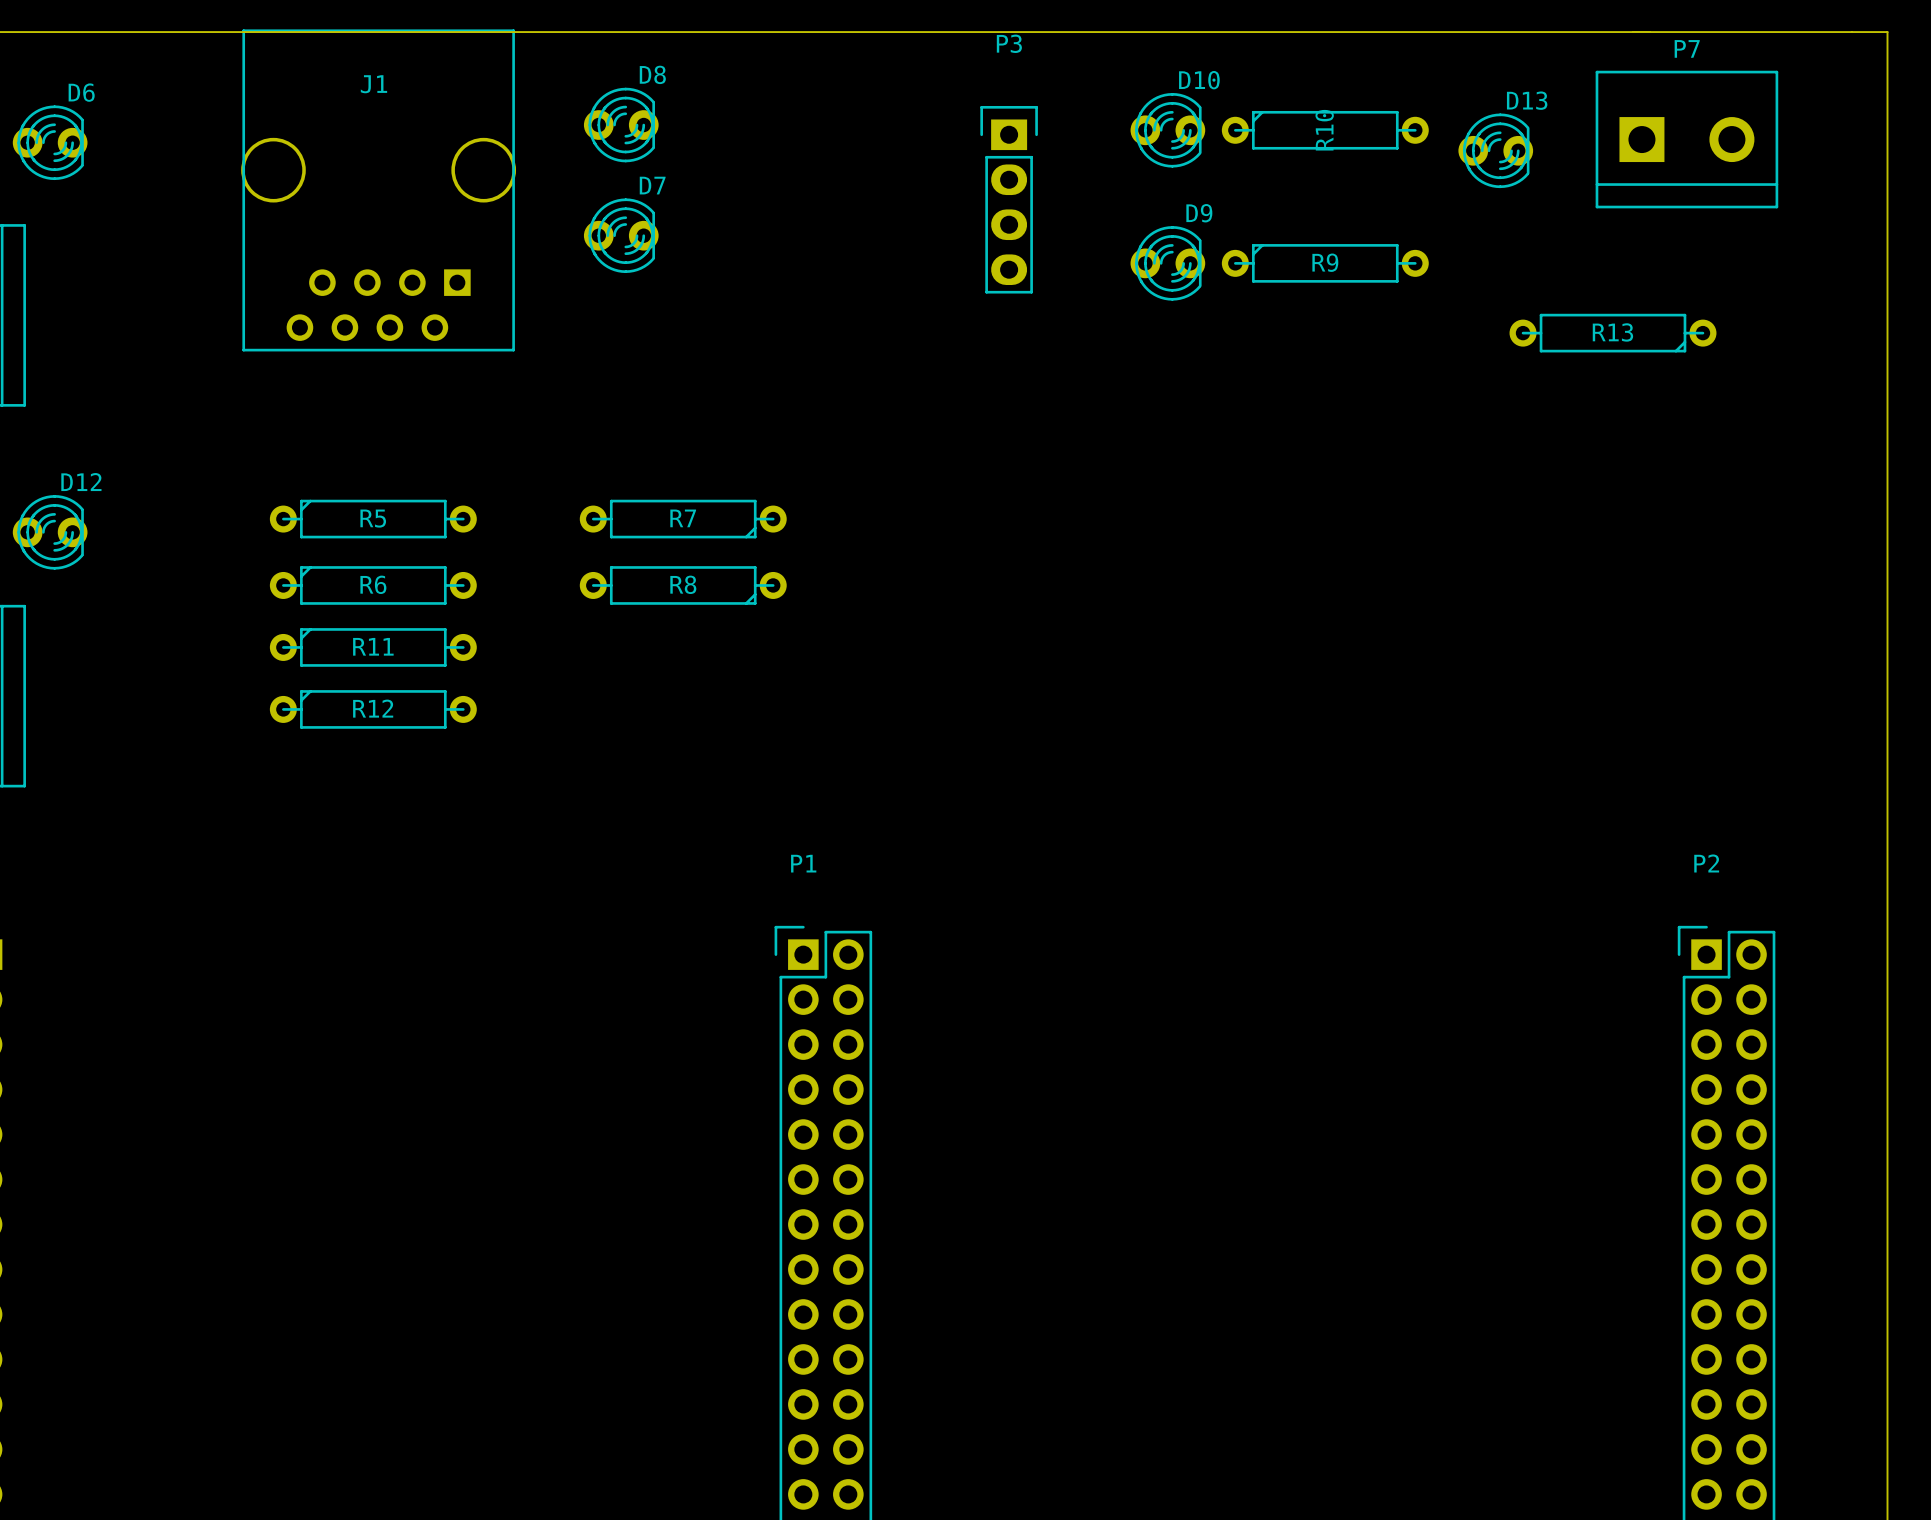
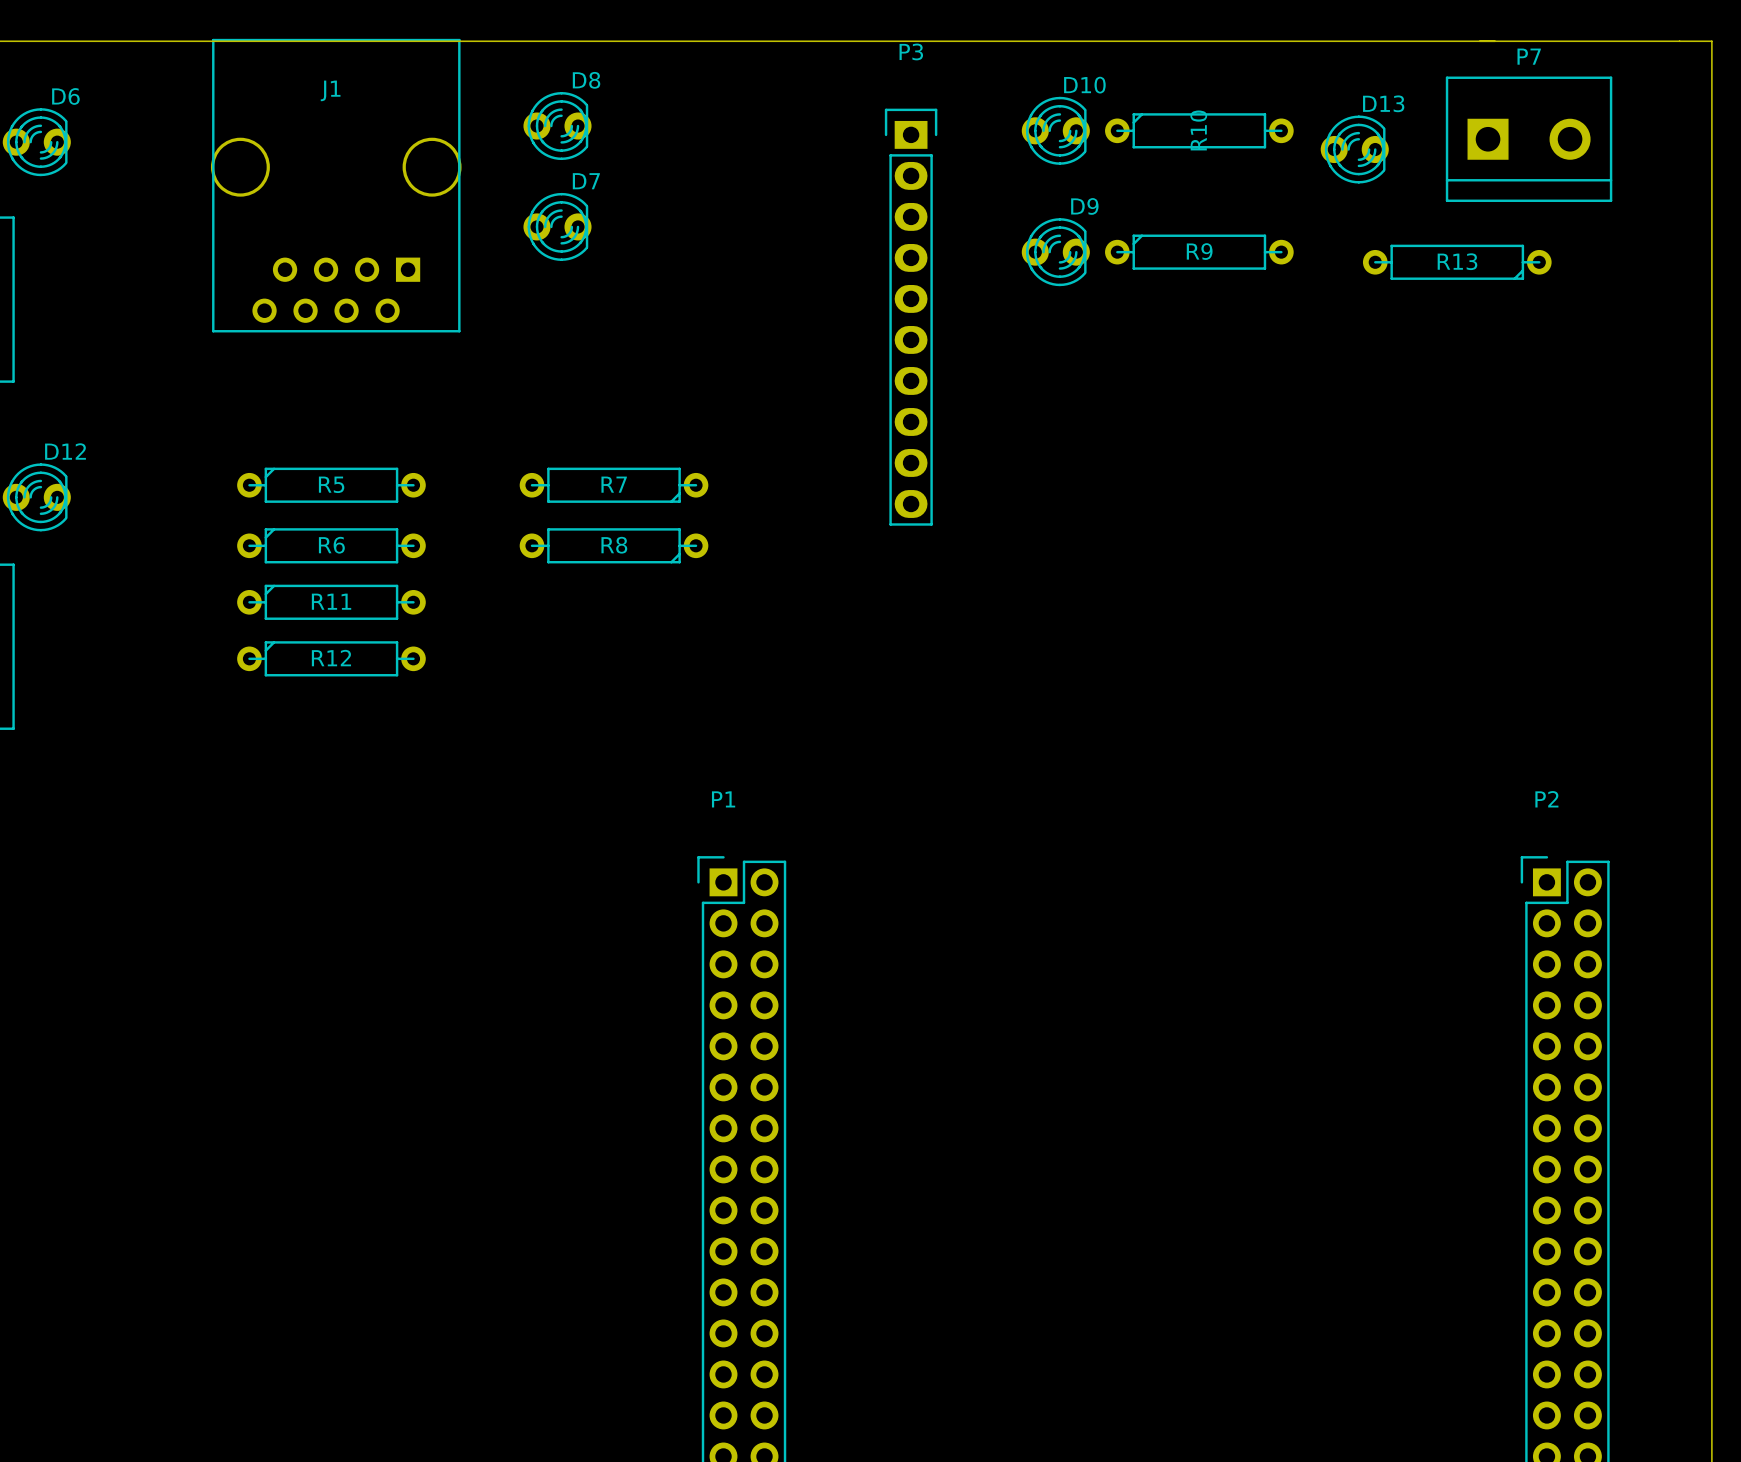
P3 footprint: [980, 105, 1038, 294] -> [884, 108, 938, 526]
R13 position: (1613, 333) -> (1457, 262)

